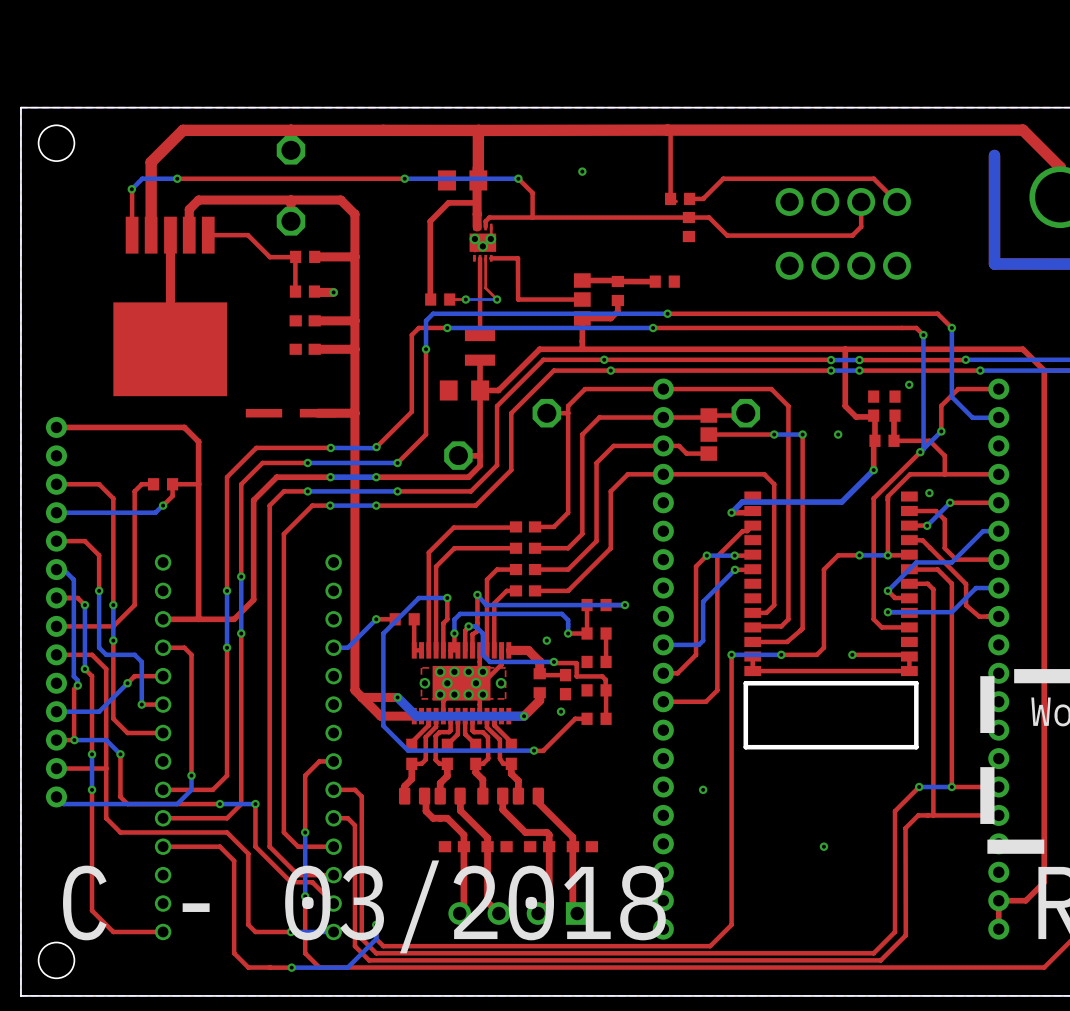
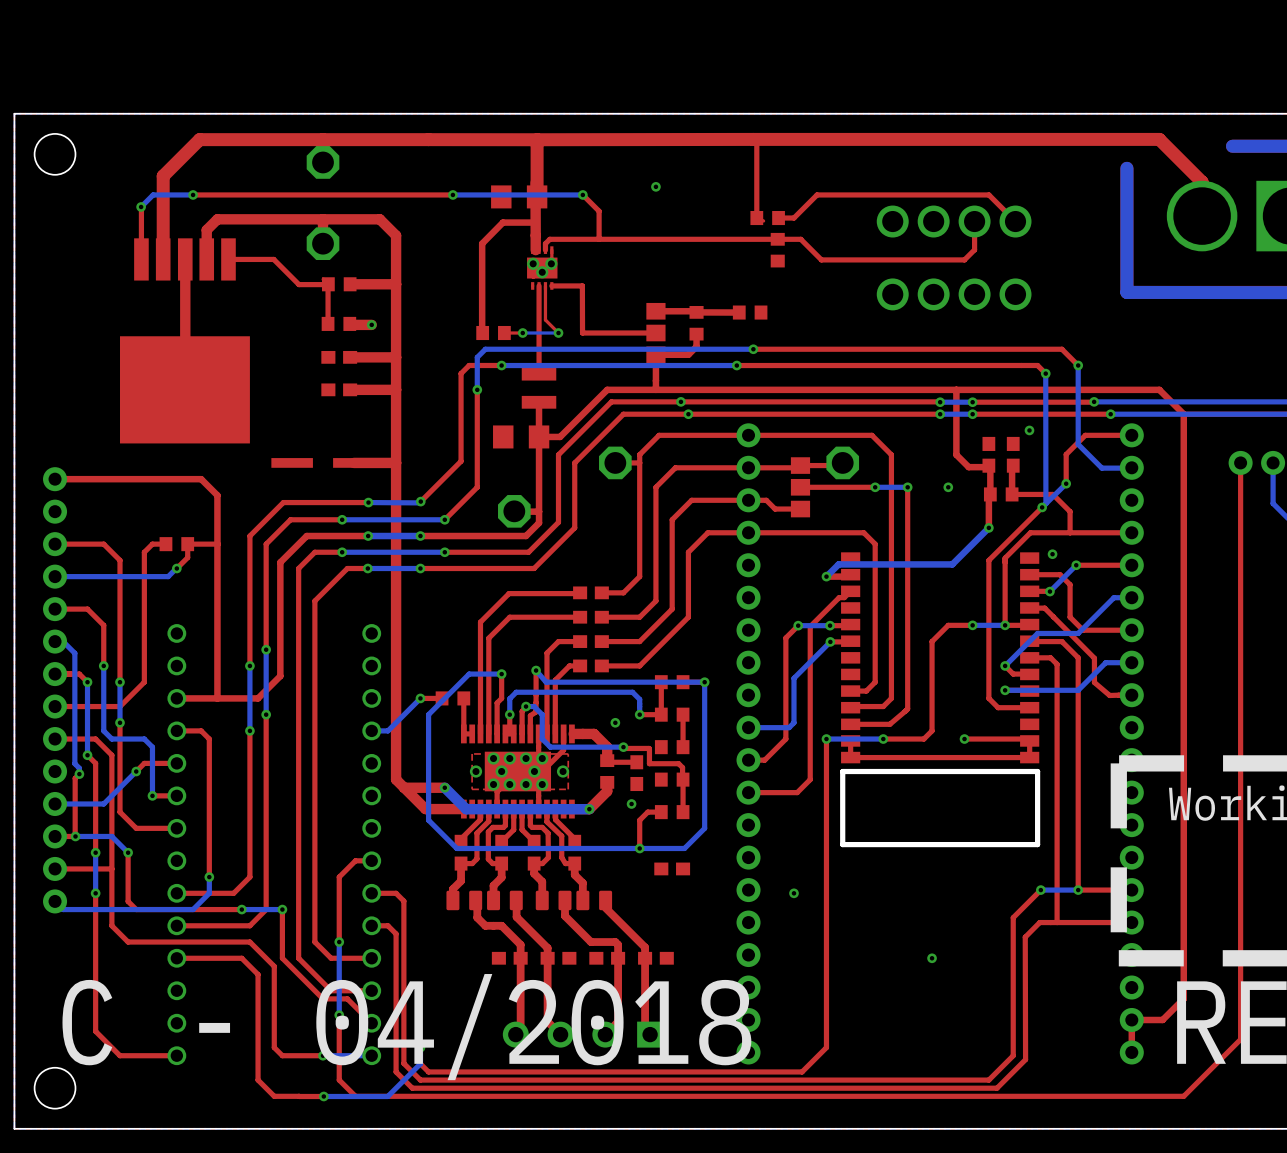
bottom track: none -> (704, 682) (704, 828) (684, 848) (600, 848)
top track: (568, 725) (543, 750) (534, 750) -> (639, 820) (639, 848)
via position: (534, 750) -> (639, 848)
part: none -> (672, 868)
text: C - 03/2018 (364, 906) -> C - 04/2018 (406, 1027)

